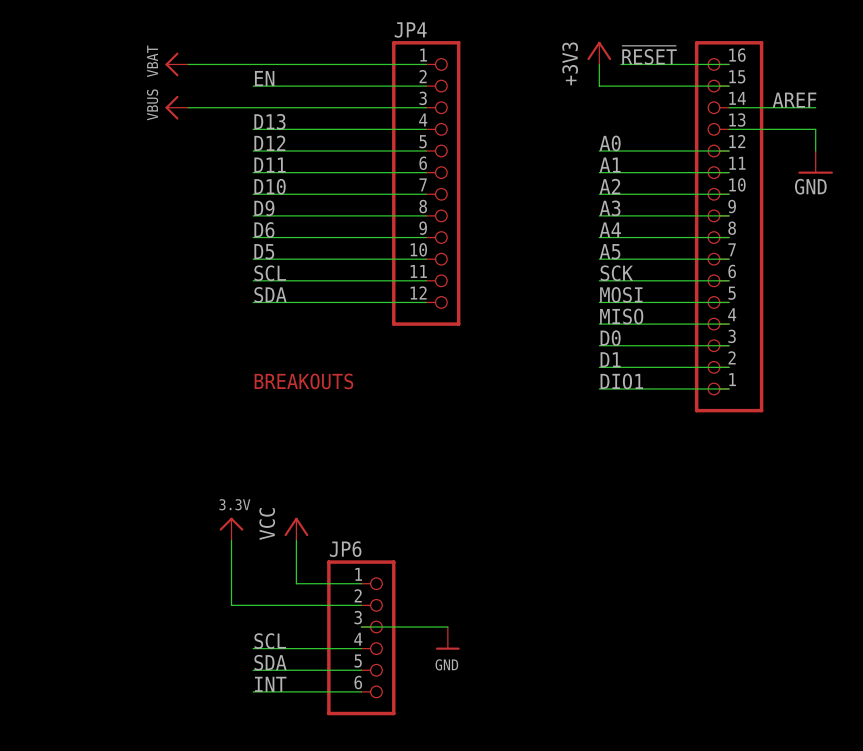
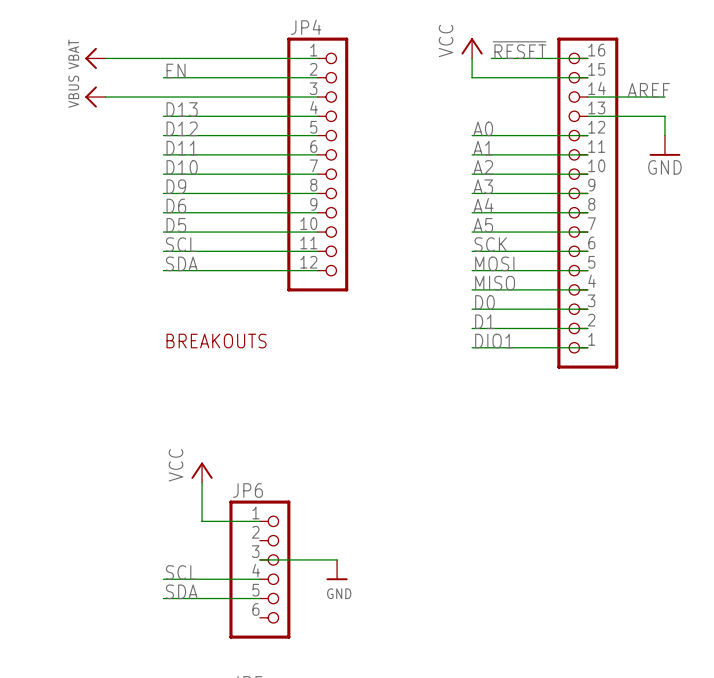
power symbol: +3V3 (599, 53) -> VCC (472, 48)
power symbol: 3.3V (231, 529) -> none
wire: (231, 540) (231, 605) (361, 605) -> none
label: INT (270, 684) -> none
wire: (253, 691) (361, 691) -> none

